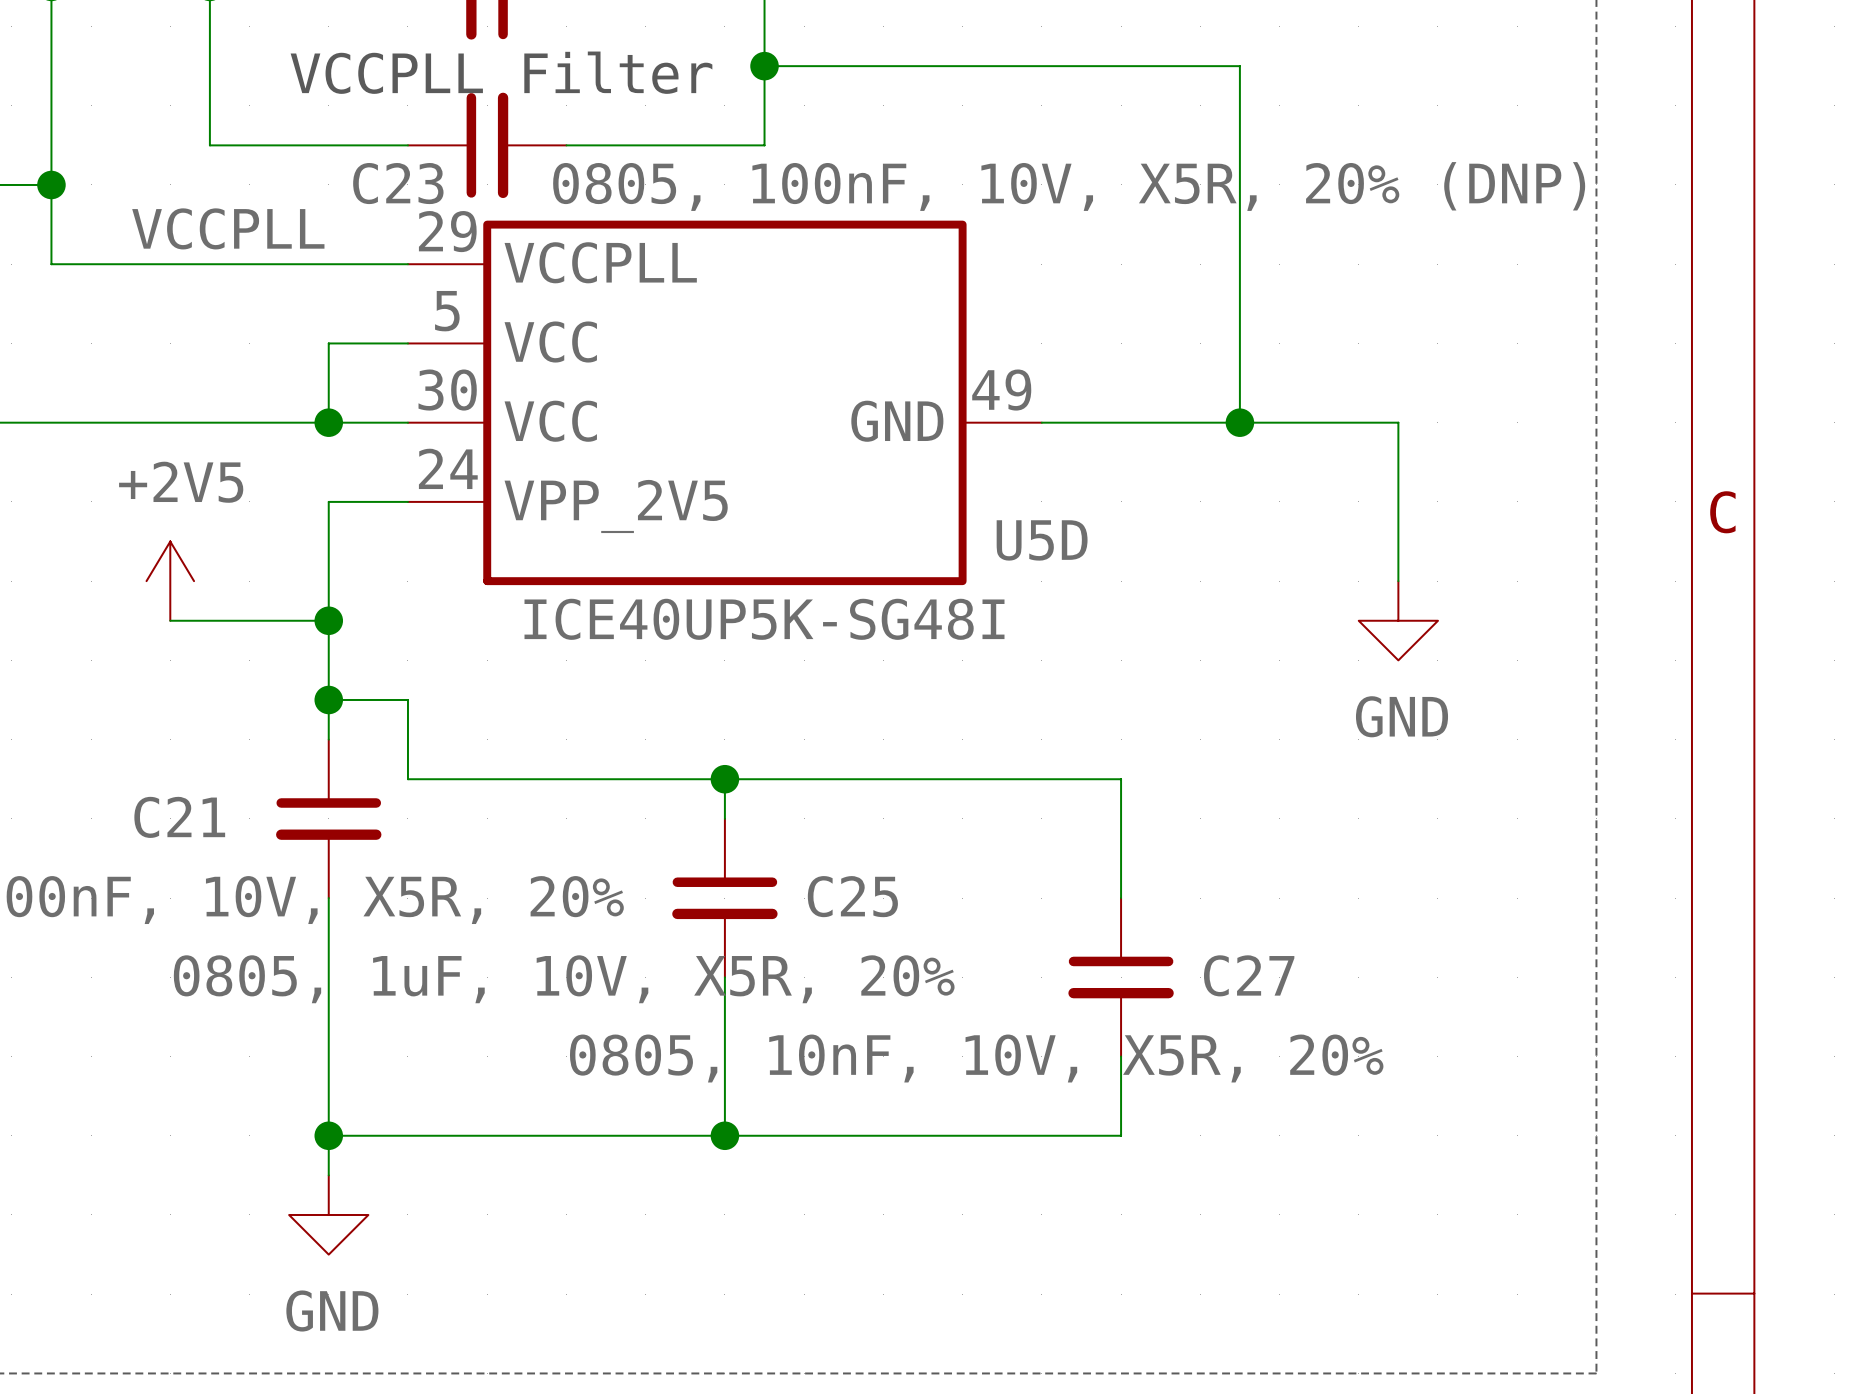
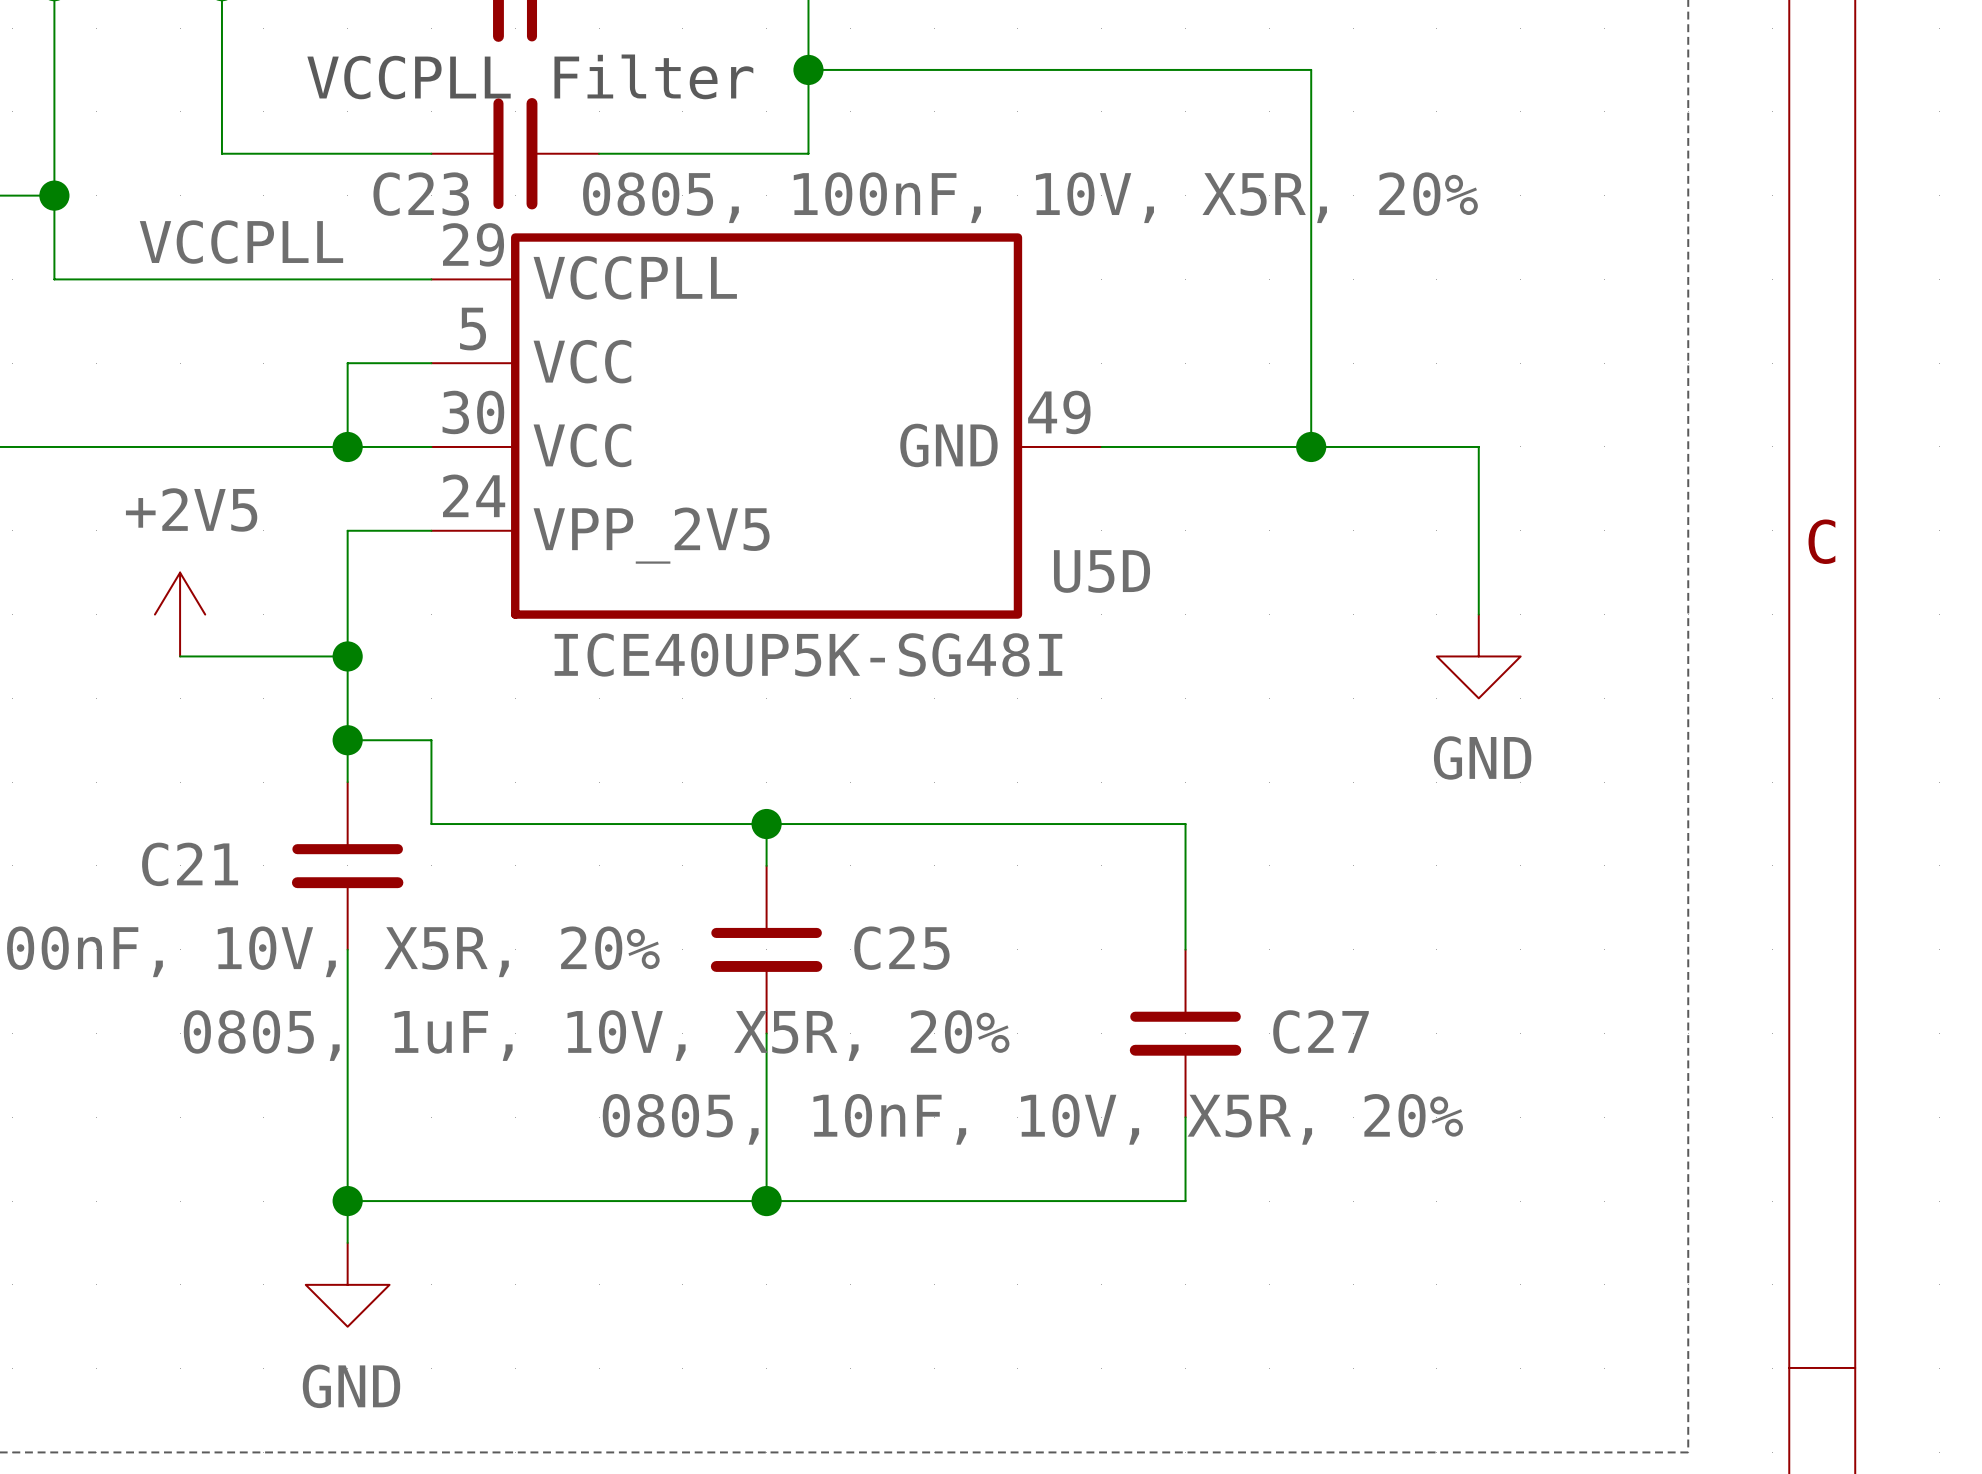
C23 value: 0805, 100nF, 10V, X5R, 20% (DNP) (1069, 186) -> 0805, 100nF, 10V, X5R, 20% (1030, 197)

